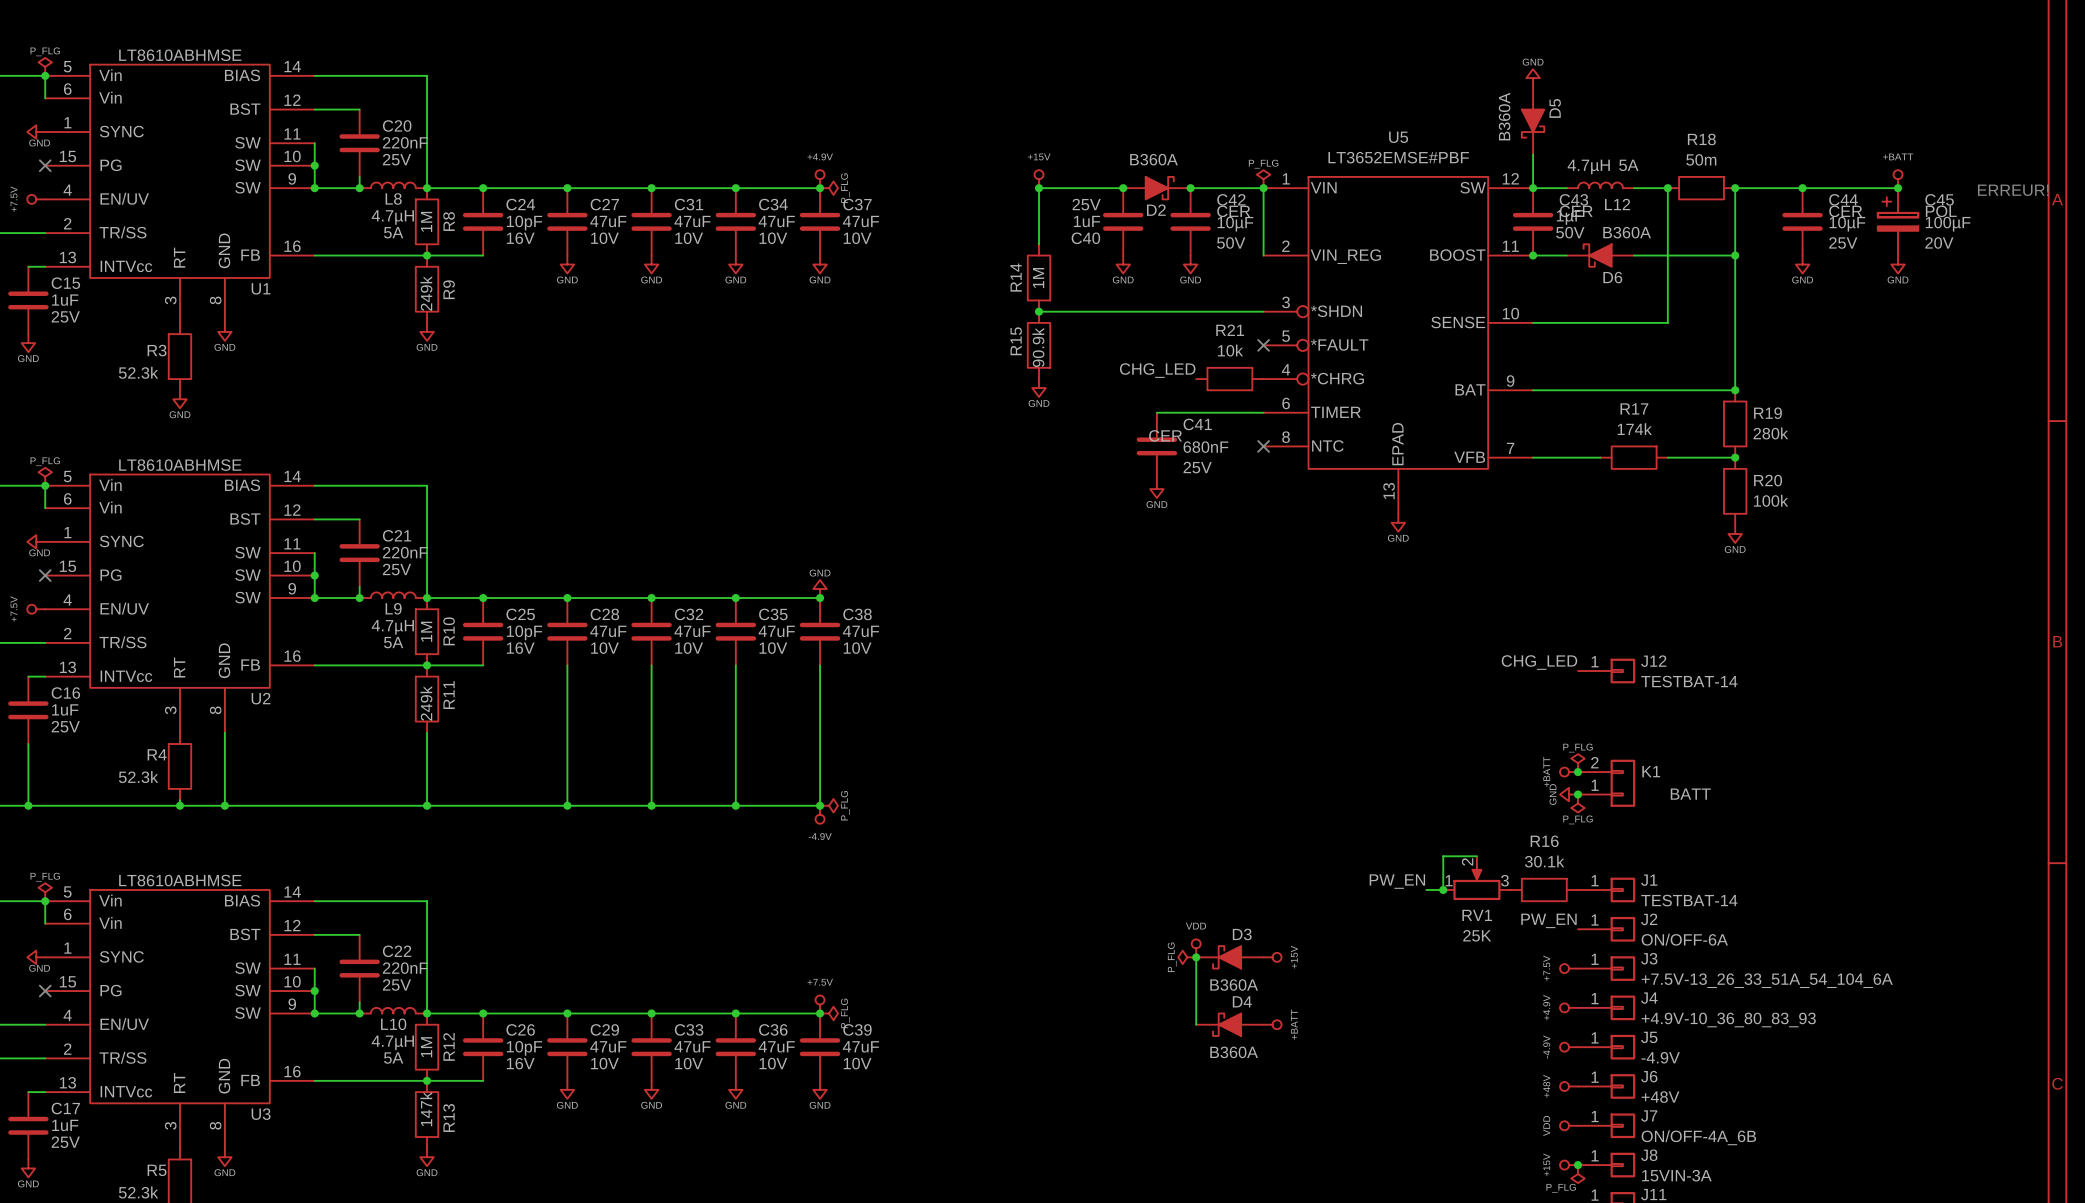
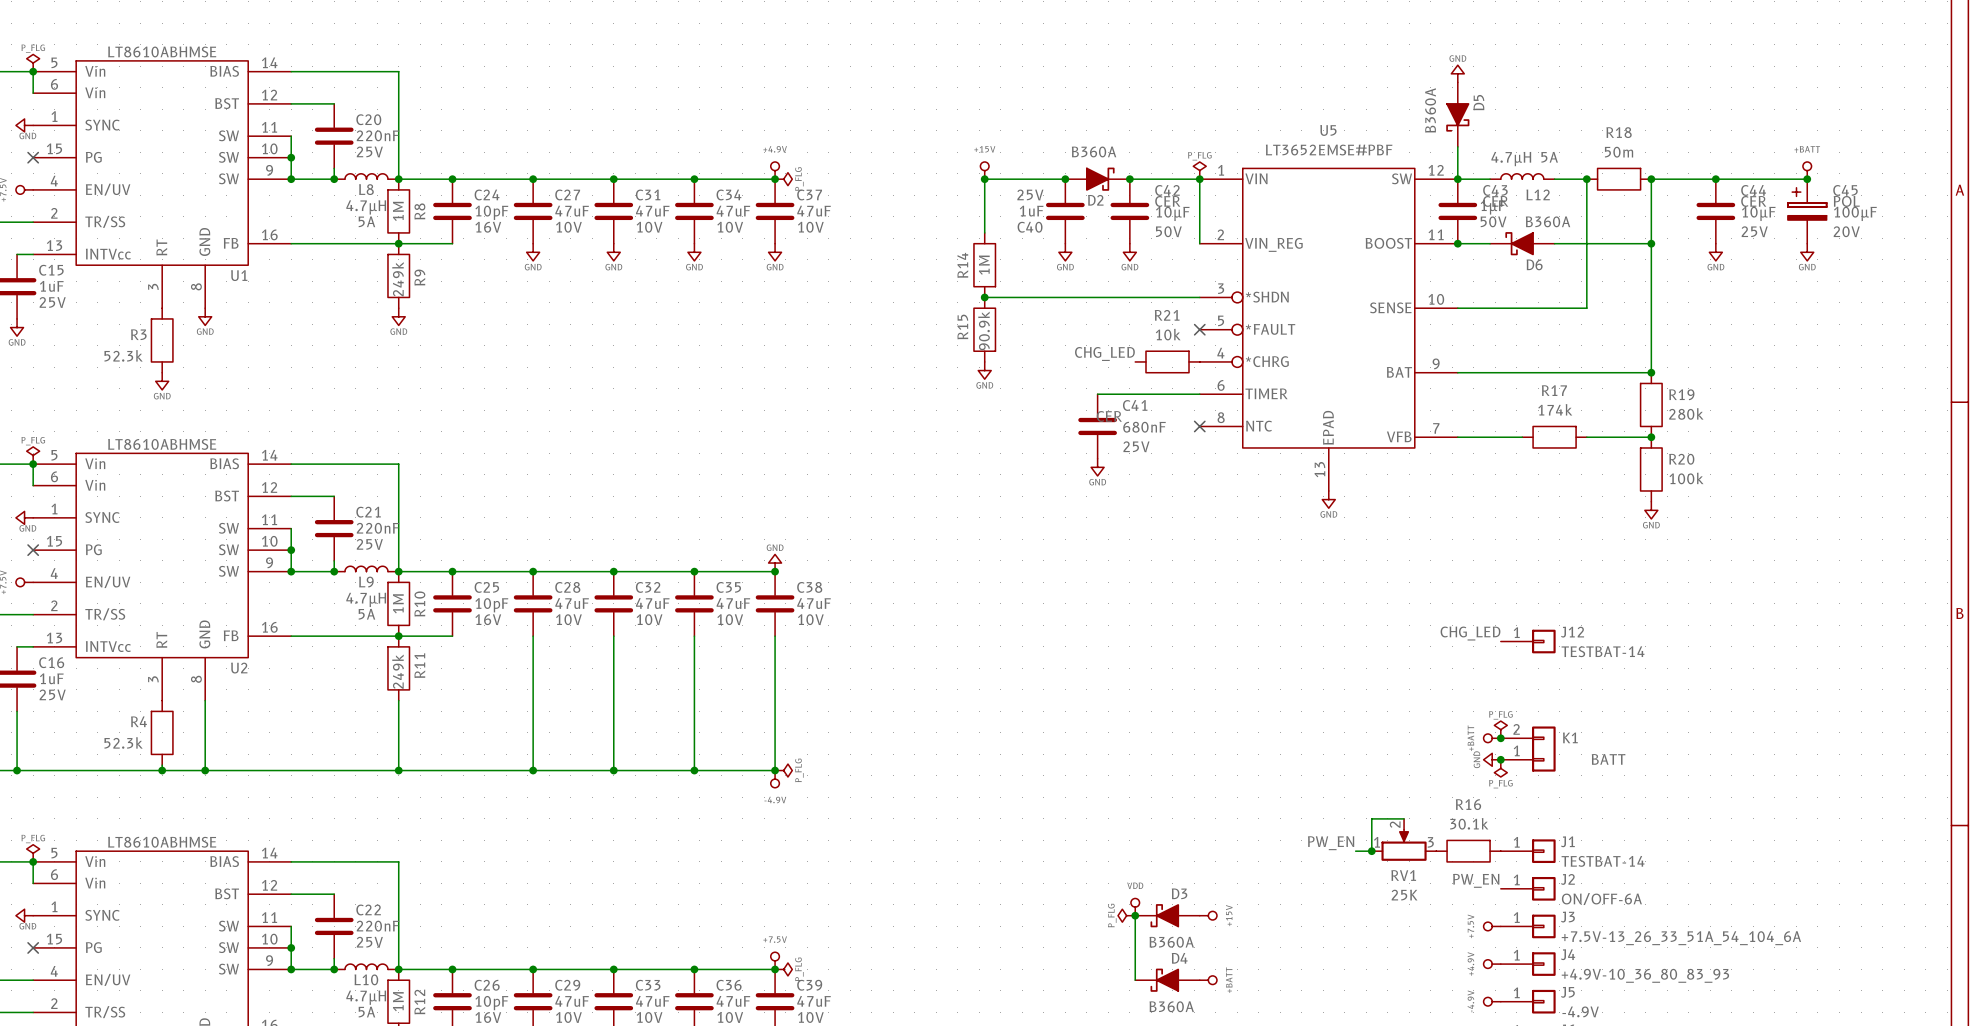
text: ERREUR! (2013, 190) -> none

